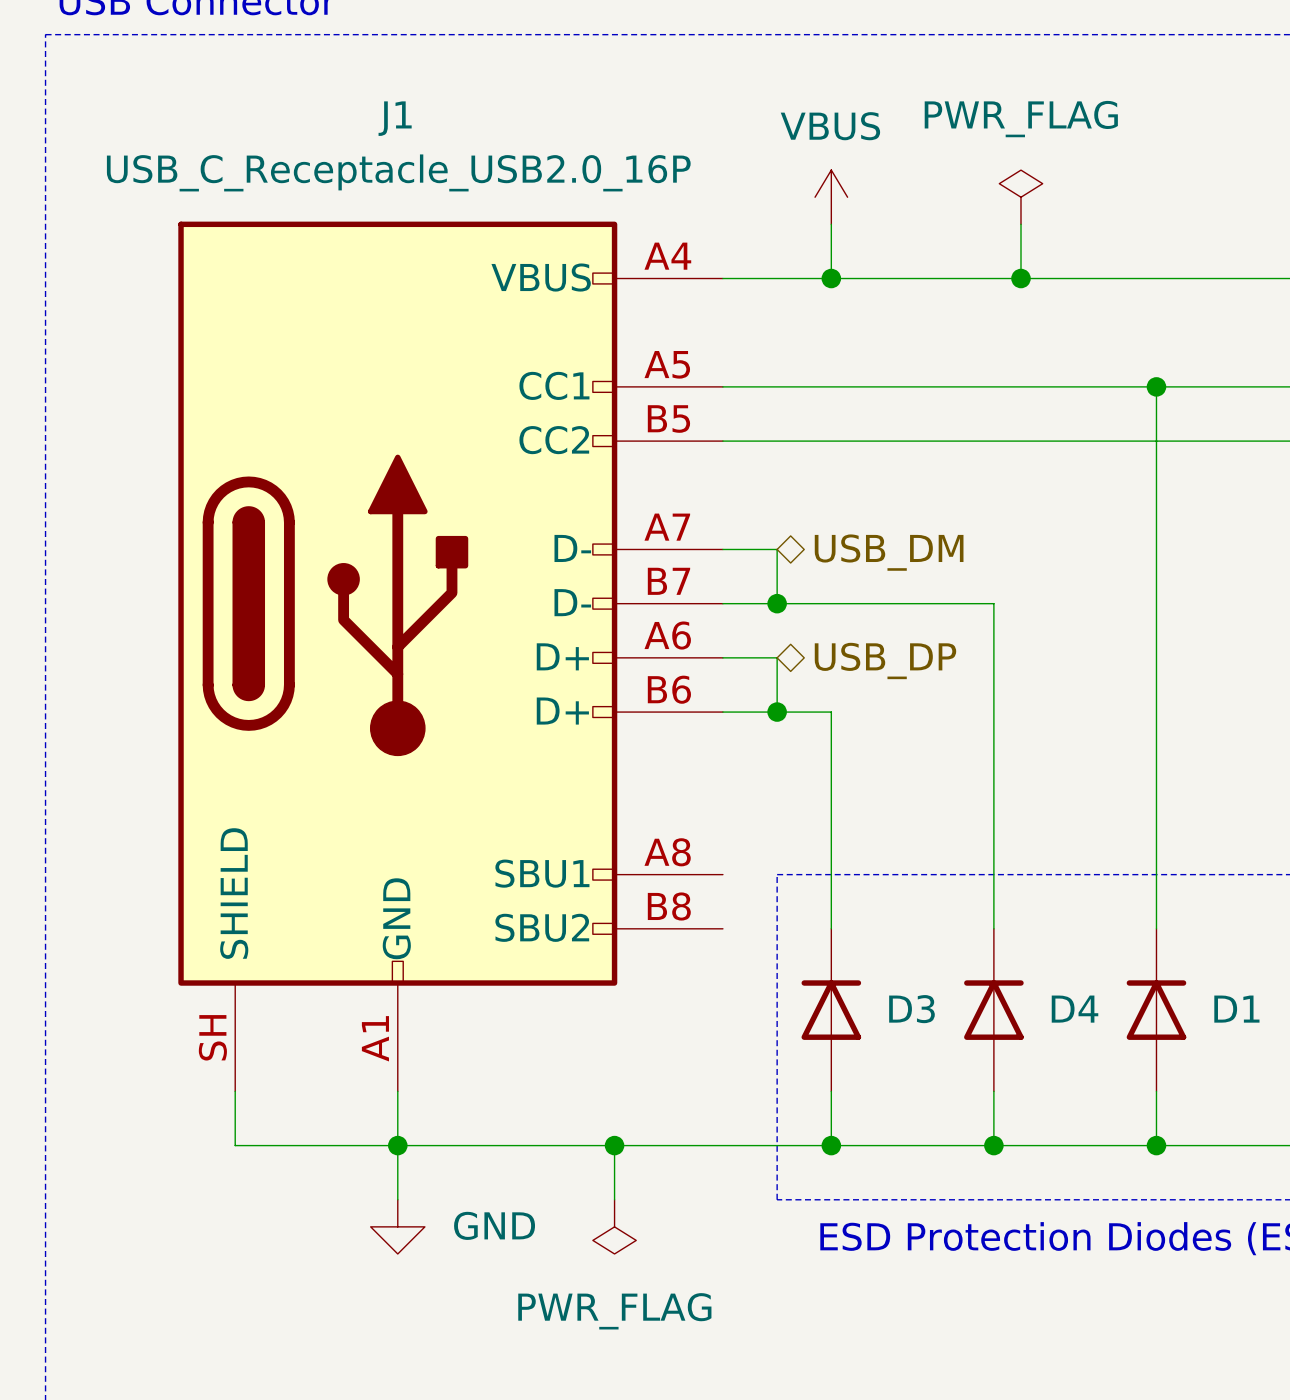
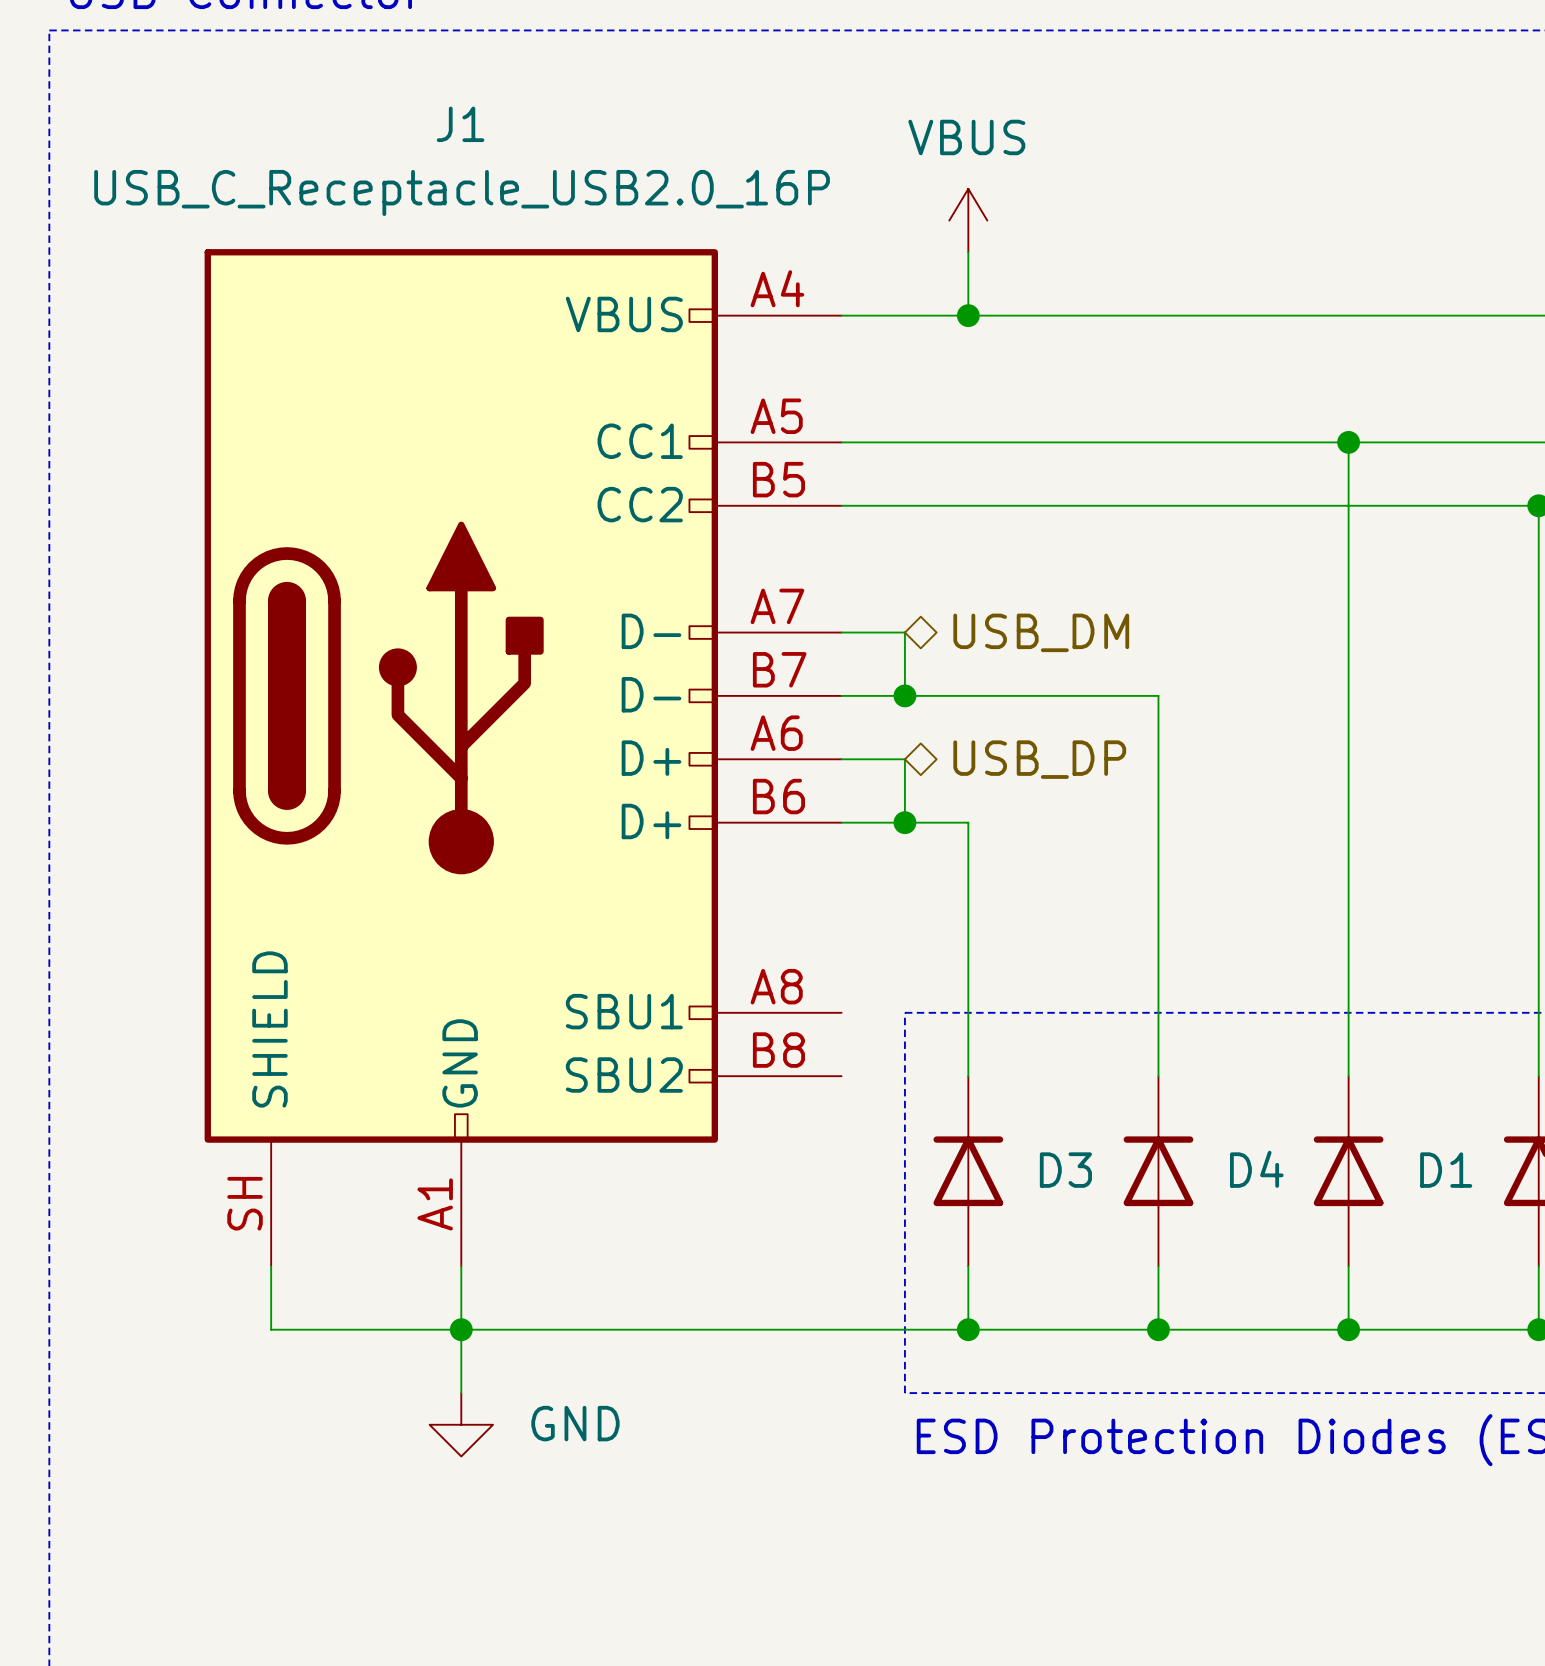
power symbol: PWR_FLAG (1020, 197) -> none
wire: (1020, 224) (1020, 278) -> none
junction: (1020, 278) -> none
wire: (614, 1145) (614, 1199) -> none
junction: (614, 1145) -> none
power symbol: PWR_FLAG (614, 1226) -> none

